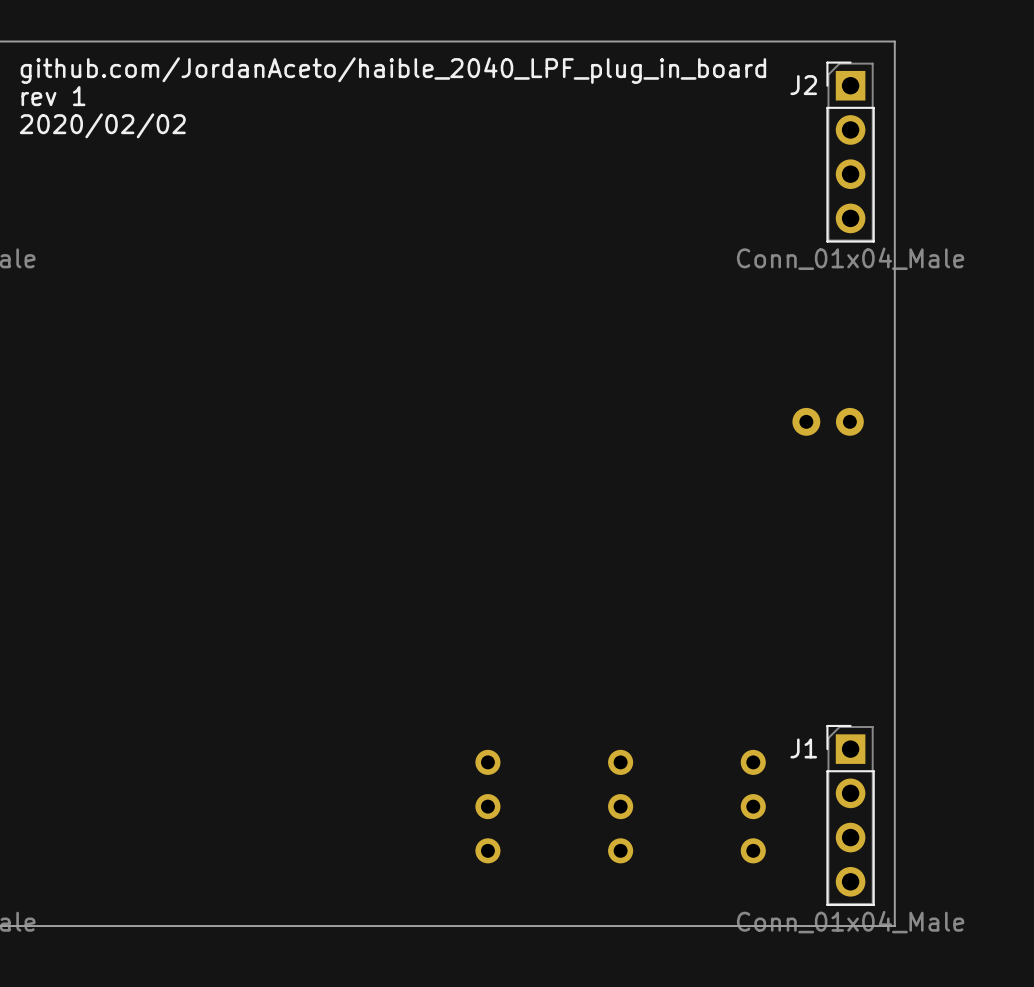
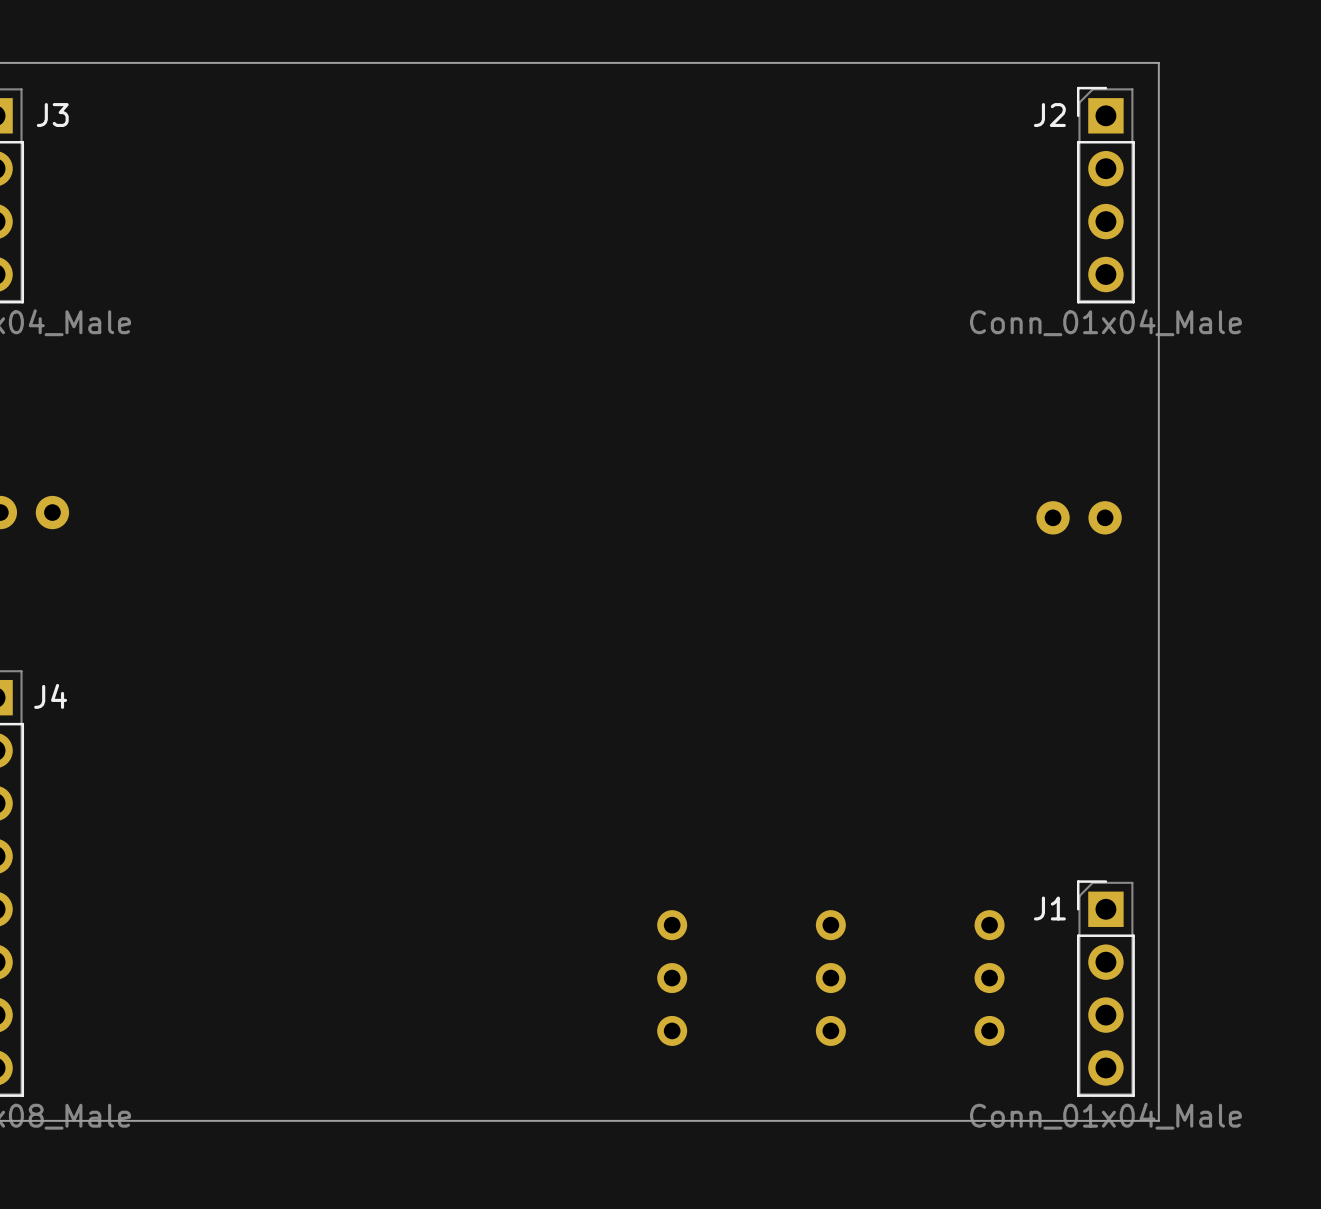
text: github.com/JordanAceto/haible_2040_LPF_plug_in_board (393, 70) -> none
text: rev 1 (53, 96) -> none
text: 2020/02/02 (102, 125) -> none

